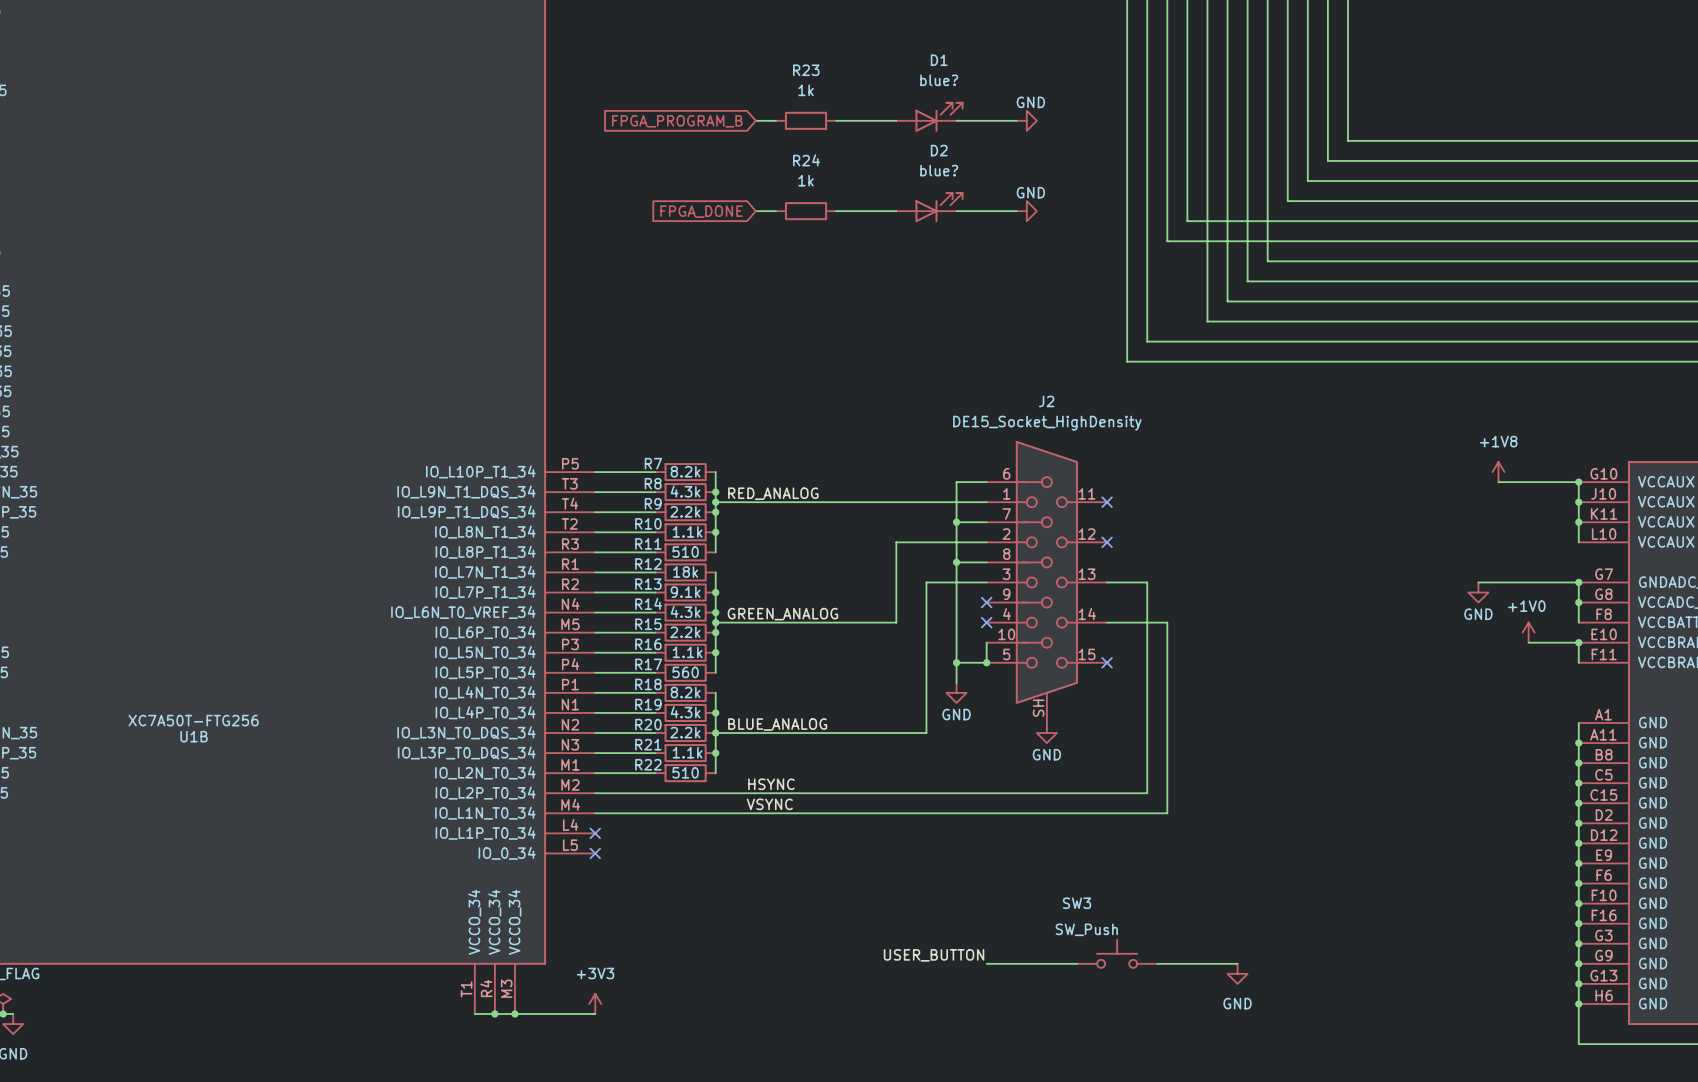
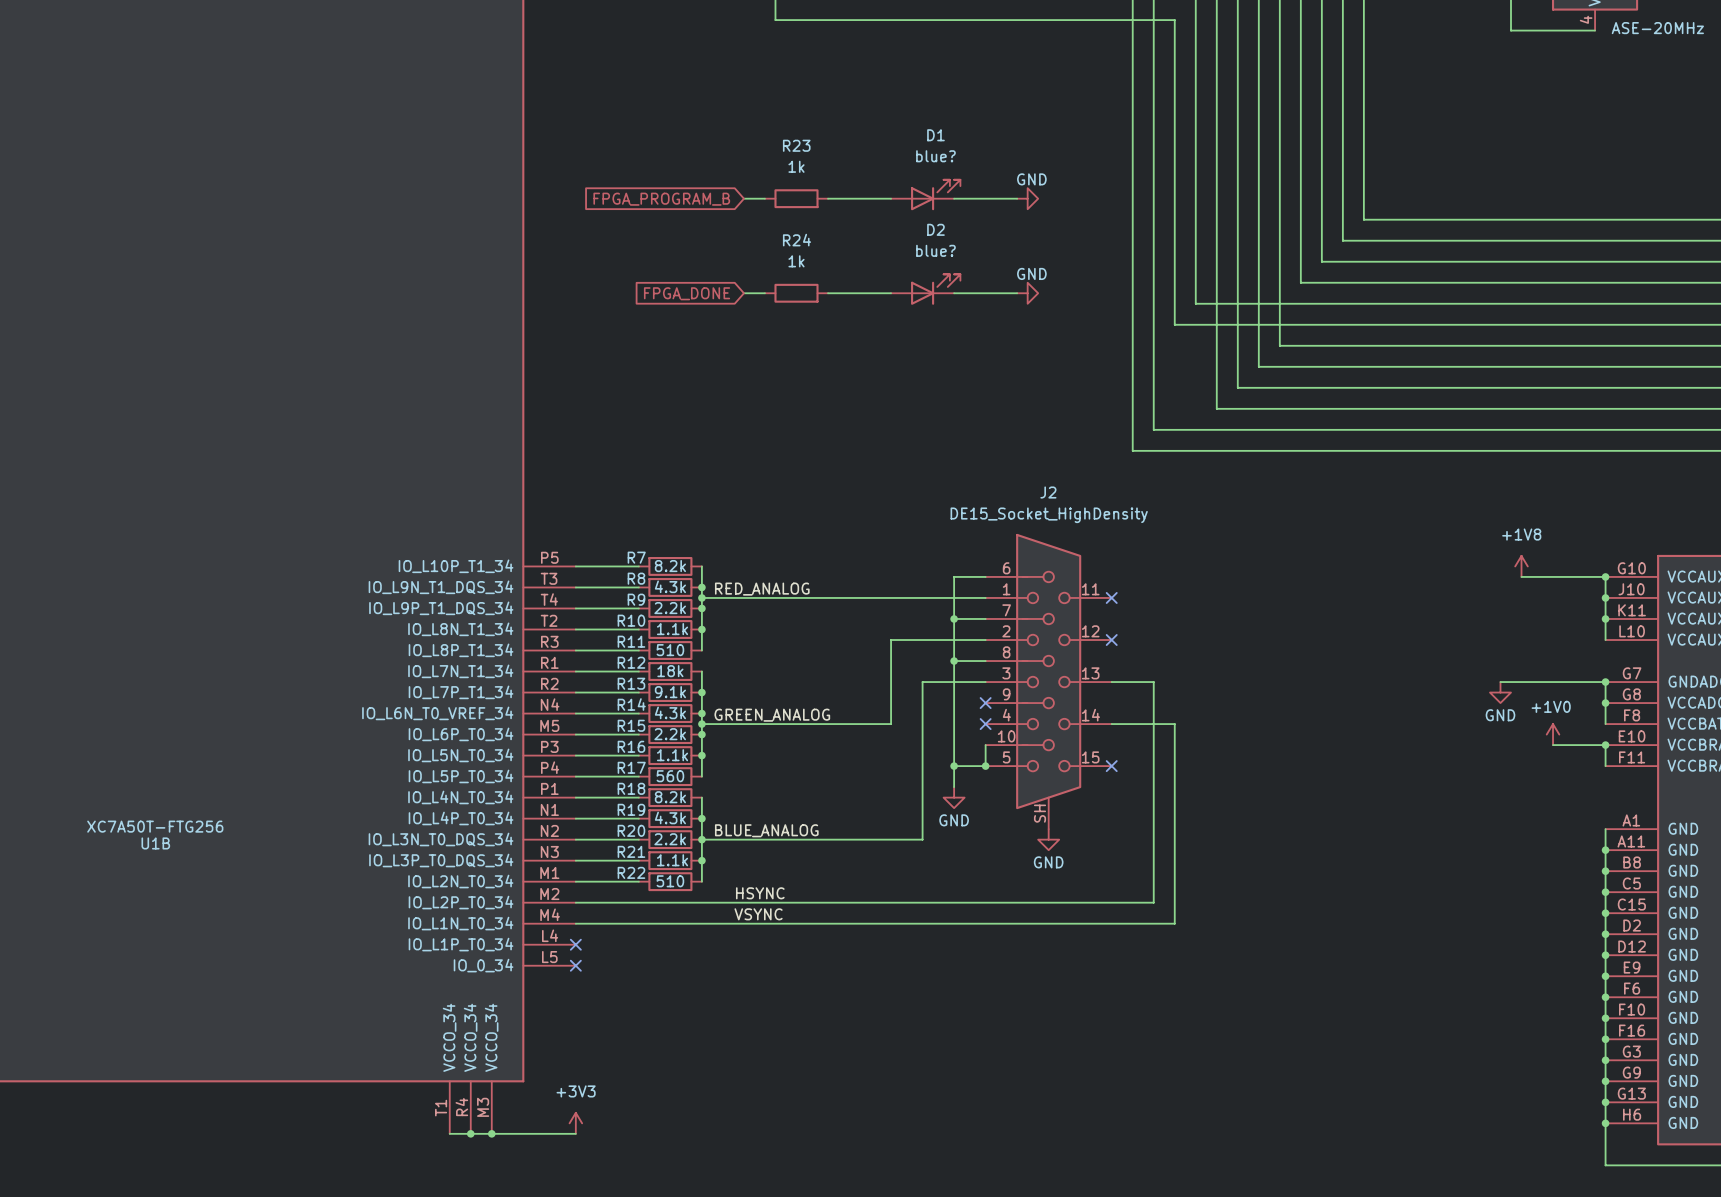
SW3: SW_Push (1117, 953) -> none
label: USER_BUTTON (934, 955) -> none
wire: (986, 963) (1077, 963) -> none
wire: (1157, 963) (1237, 963) -> none
power symbol: GND (1237, 973) -> none

